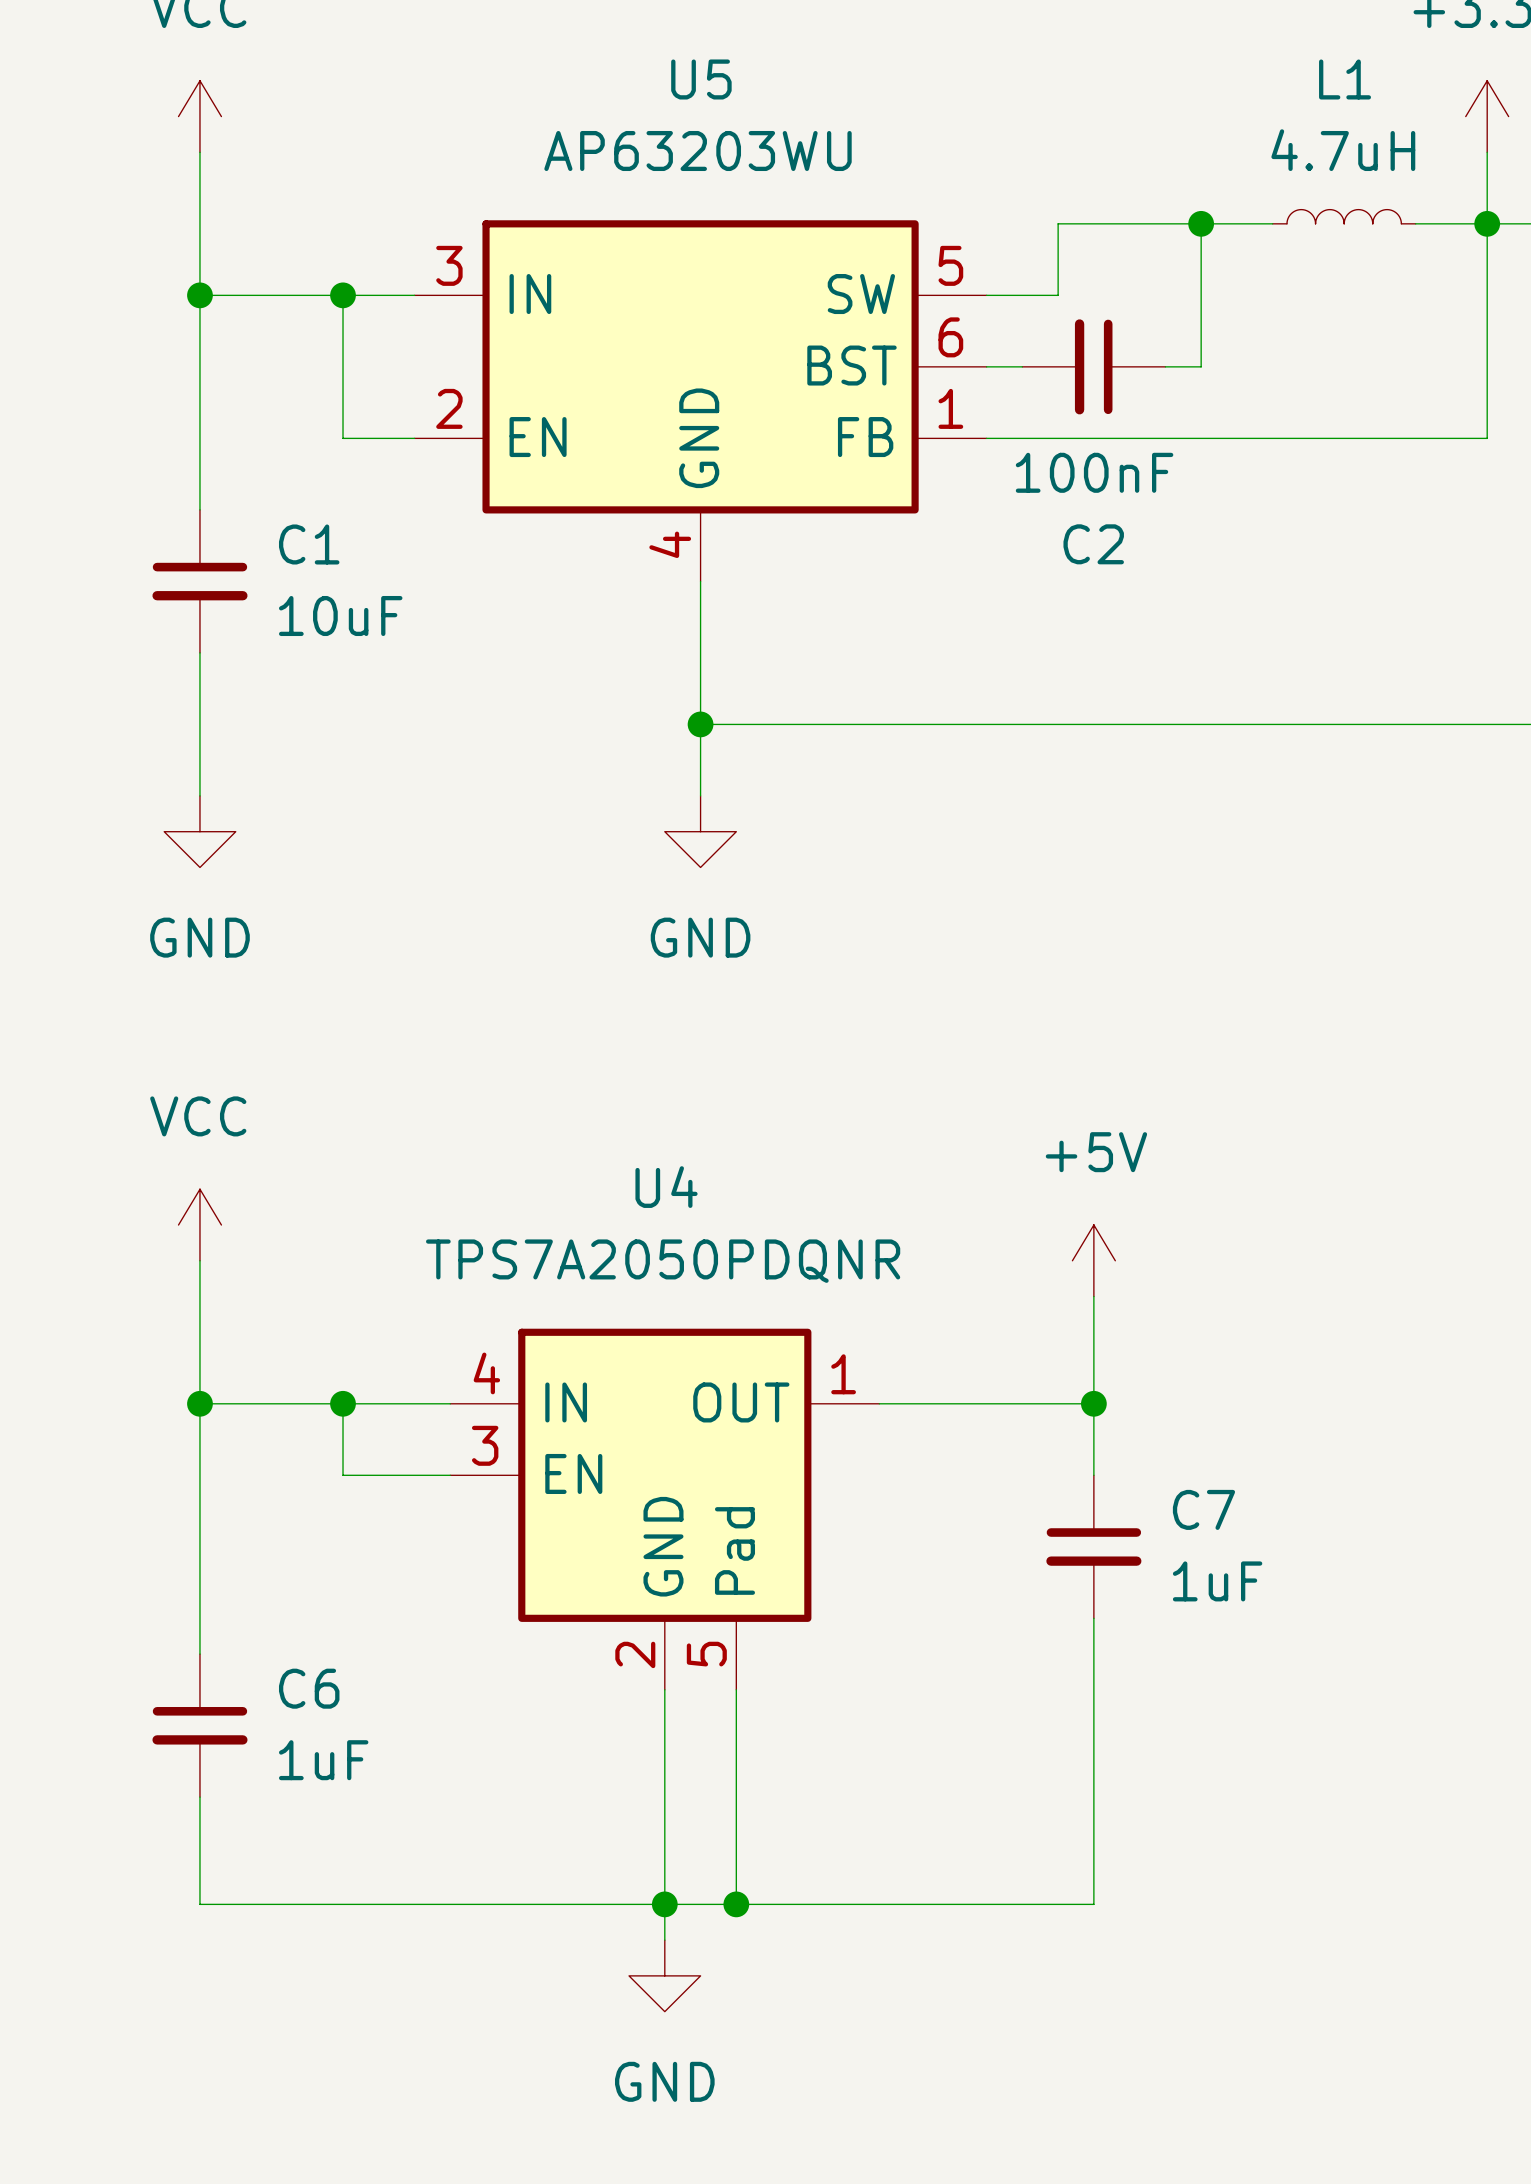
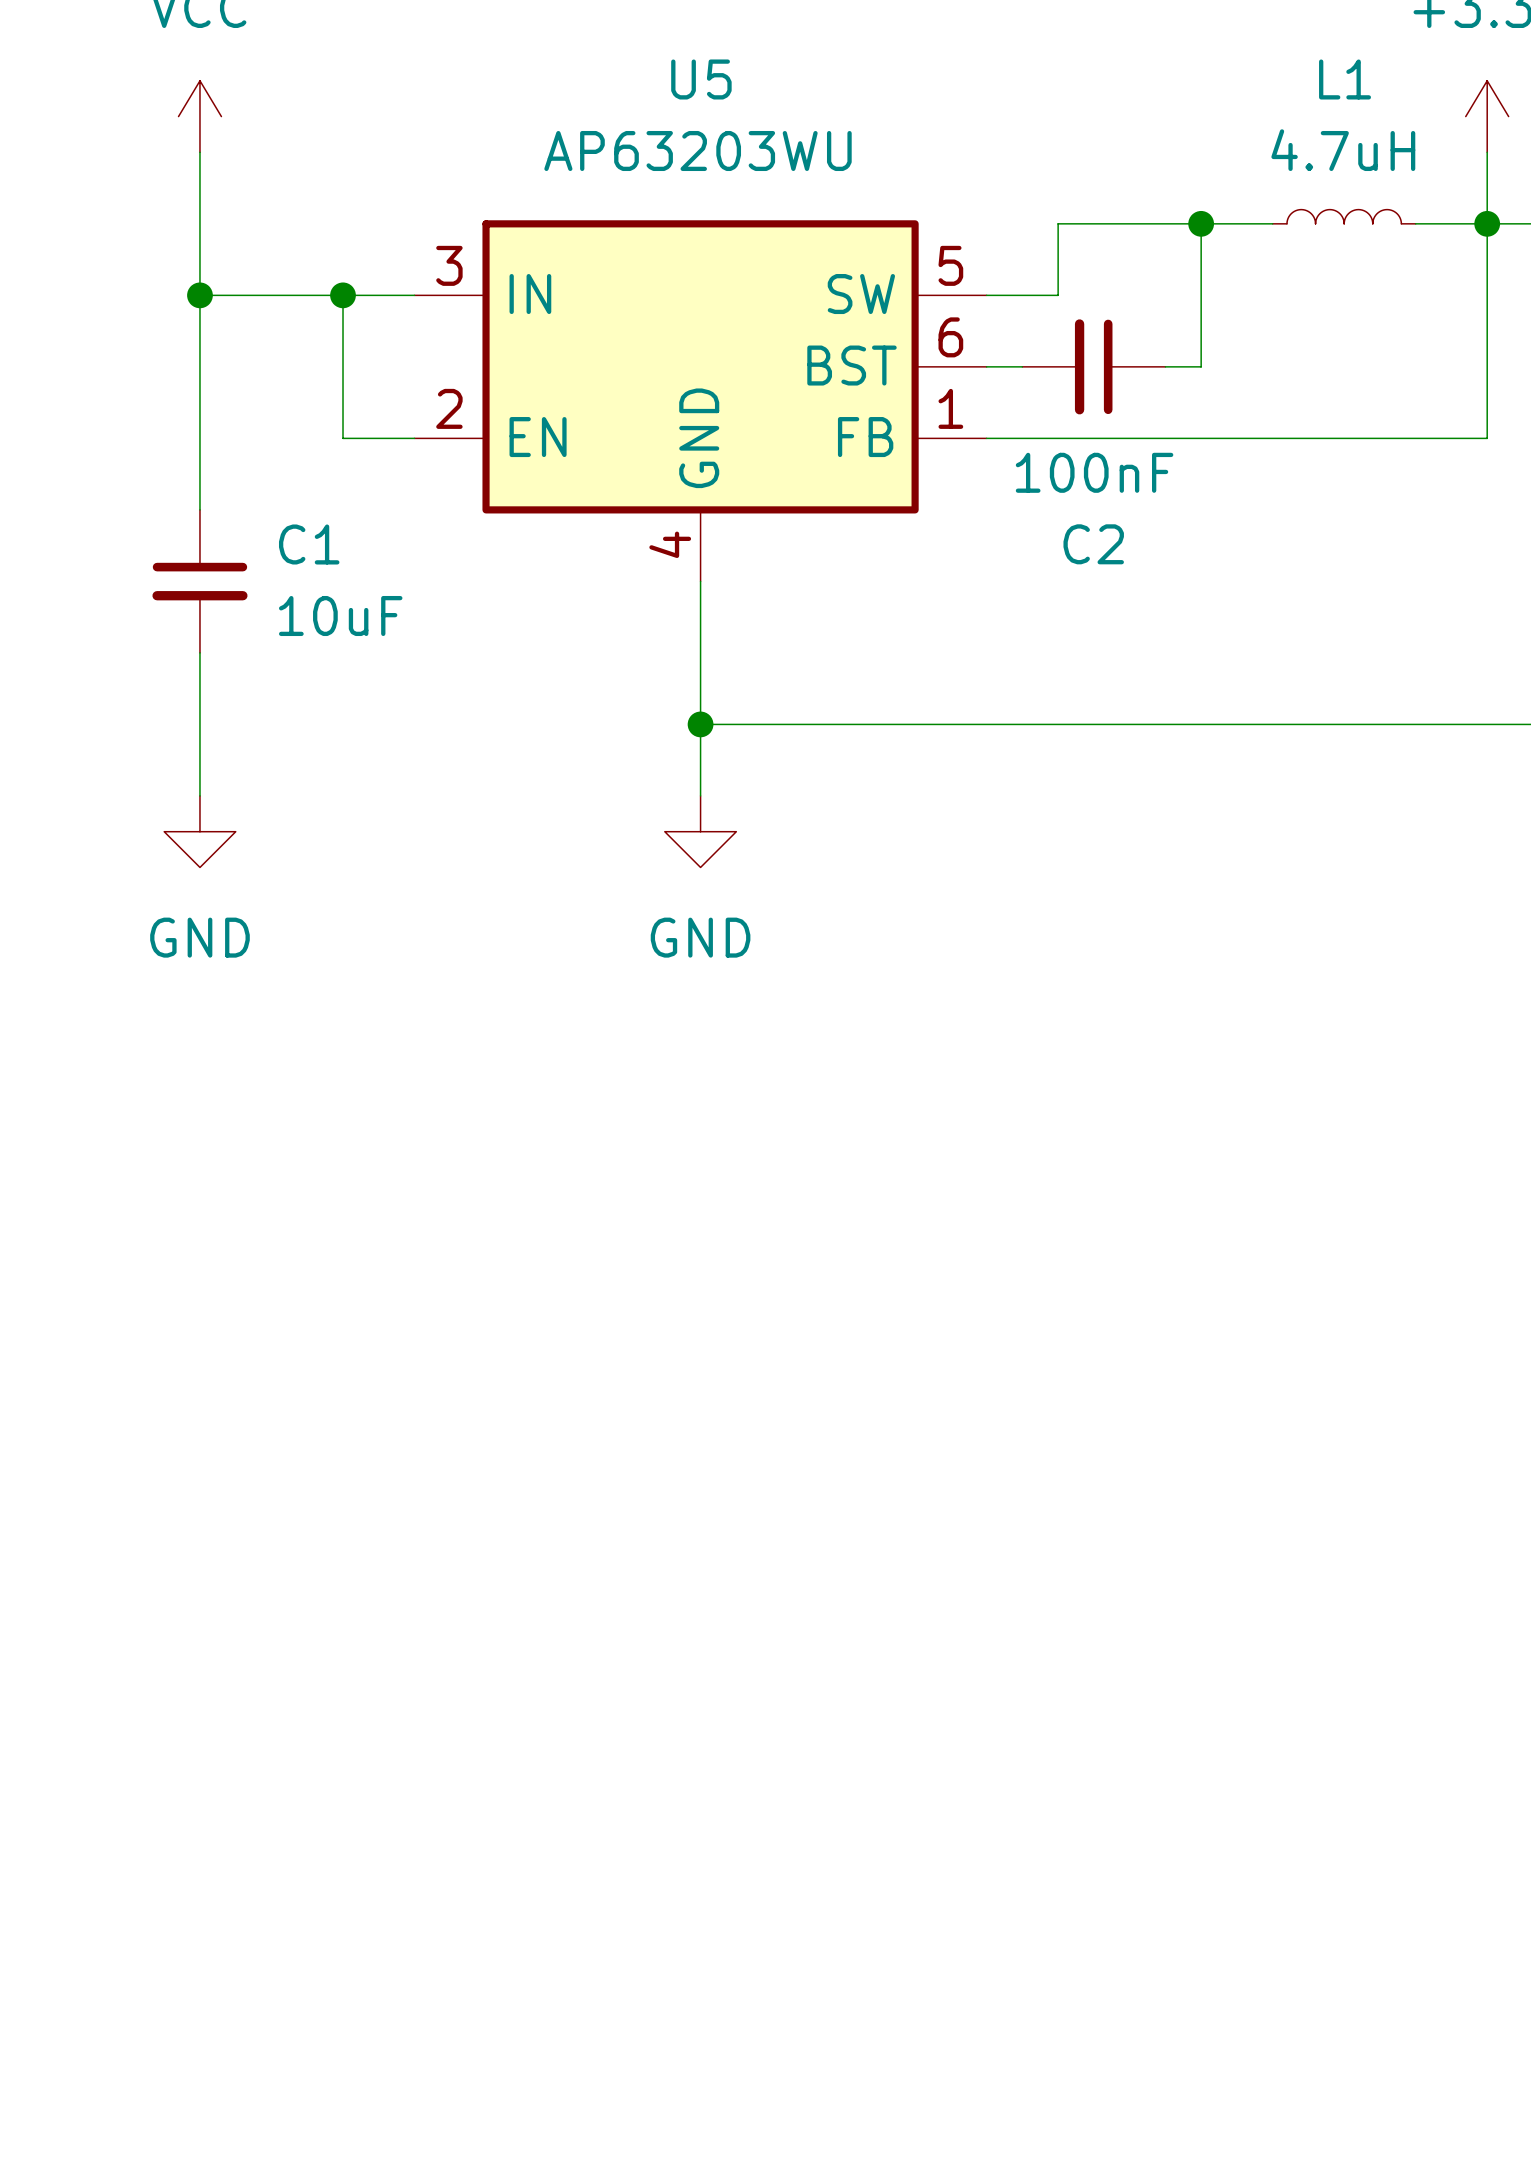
power symbol: VCC (199, 1225) -> none
wire: (199, 1260) (199, 1654) -> none
power symbol: +5V (1093, 1260) -> none
wire: (1093, 1296) (1093, 1475) -> none
wire: (199, 1403) (450, 1403) -> none
junction: (199, 1403) -> none
wire: (343, 1403) (343, 1475) (450, 1475) -> none
junction: (343, 1403) -> none
wire: (879, 1403) (1093, 1403) -> none
junction: (1093, 1403) -> none
U4: TPS7A2050PDQNR (664, 1509) -> none
C7: 1uF (1093, 1546) -> none
wire: (1093, 1618) (1093, 1904) (199, 1904) (199, 1797) -> none
wire: (664, 1689) (664, 1940) -> none
wire: (736, 1689) (736, 1904) -> none
C6: 1uF (199, 1725) -> none
junction: (664, 1904) -> none
junction: (736, 1904) -> none
power symbol: GND (664, 1975) -> none

